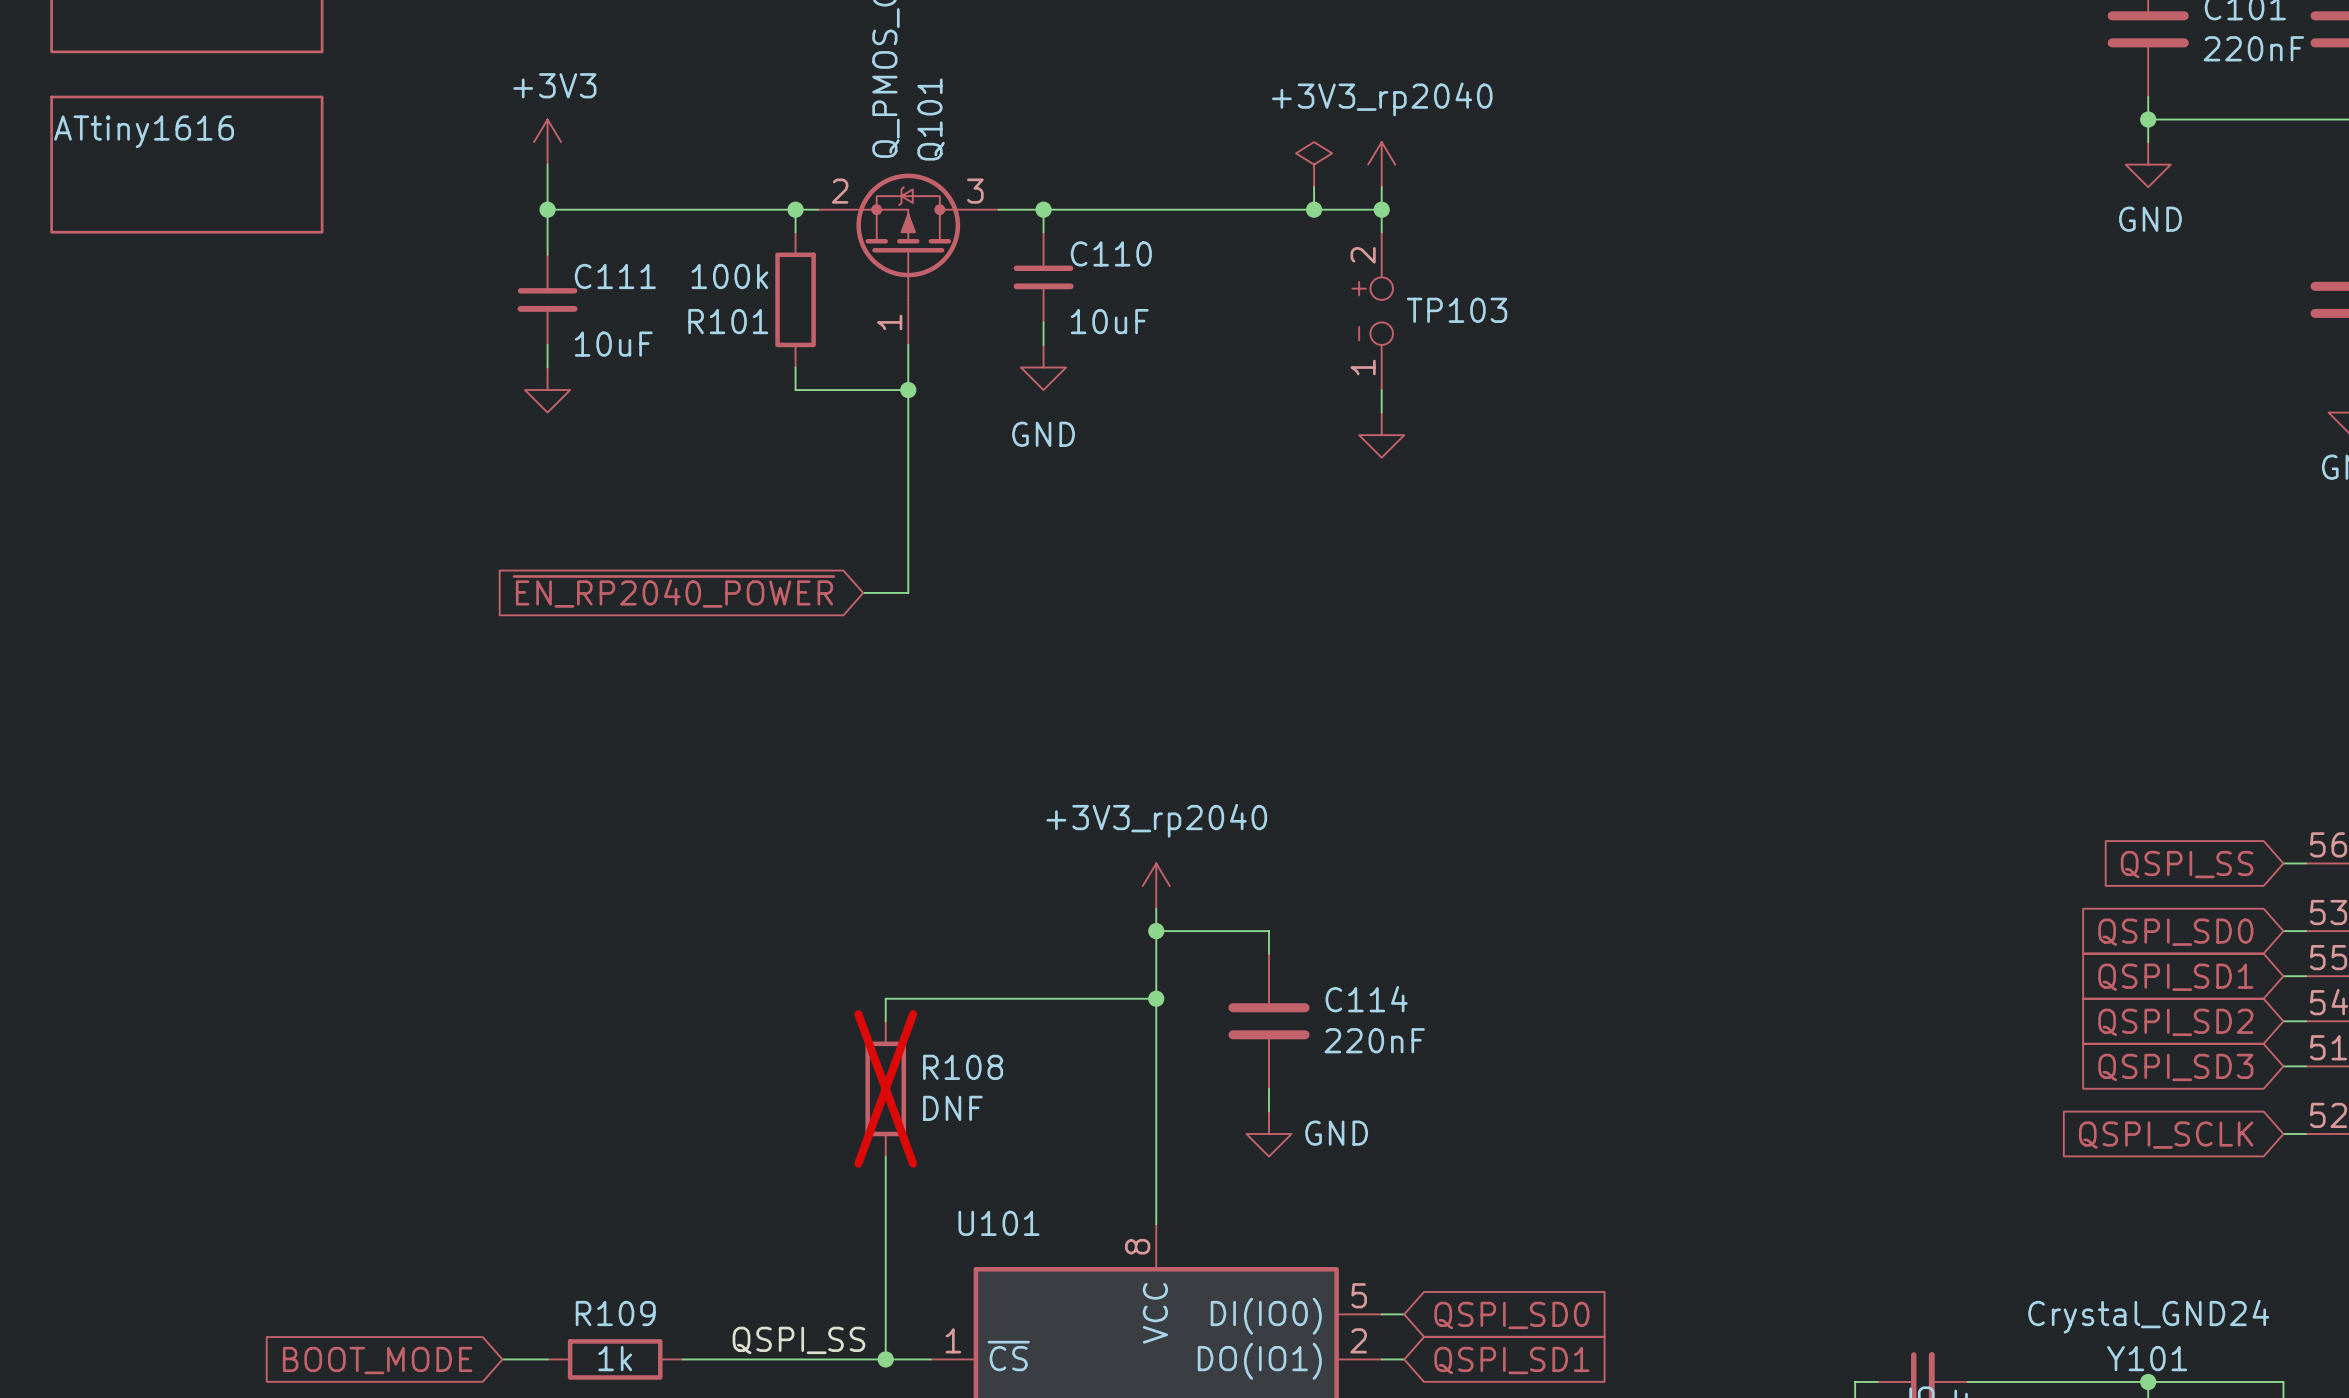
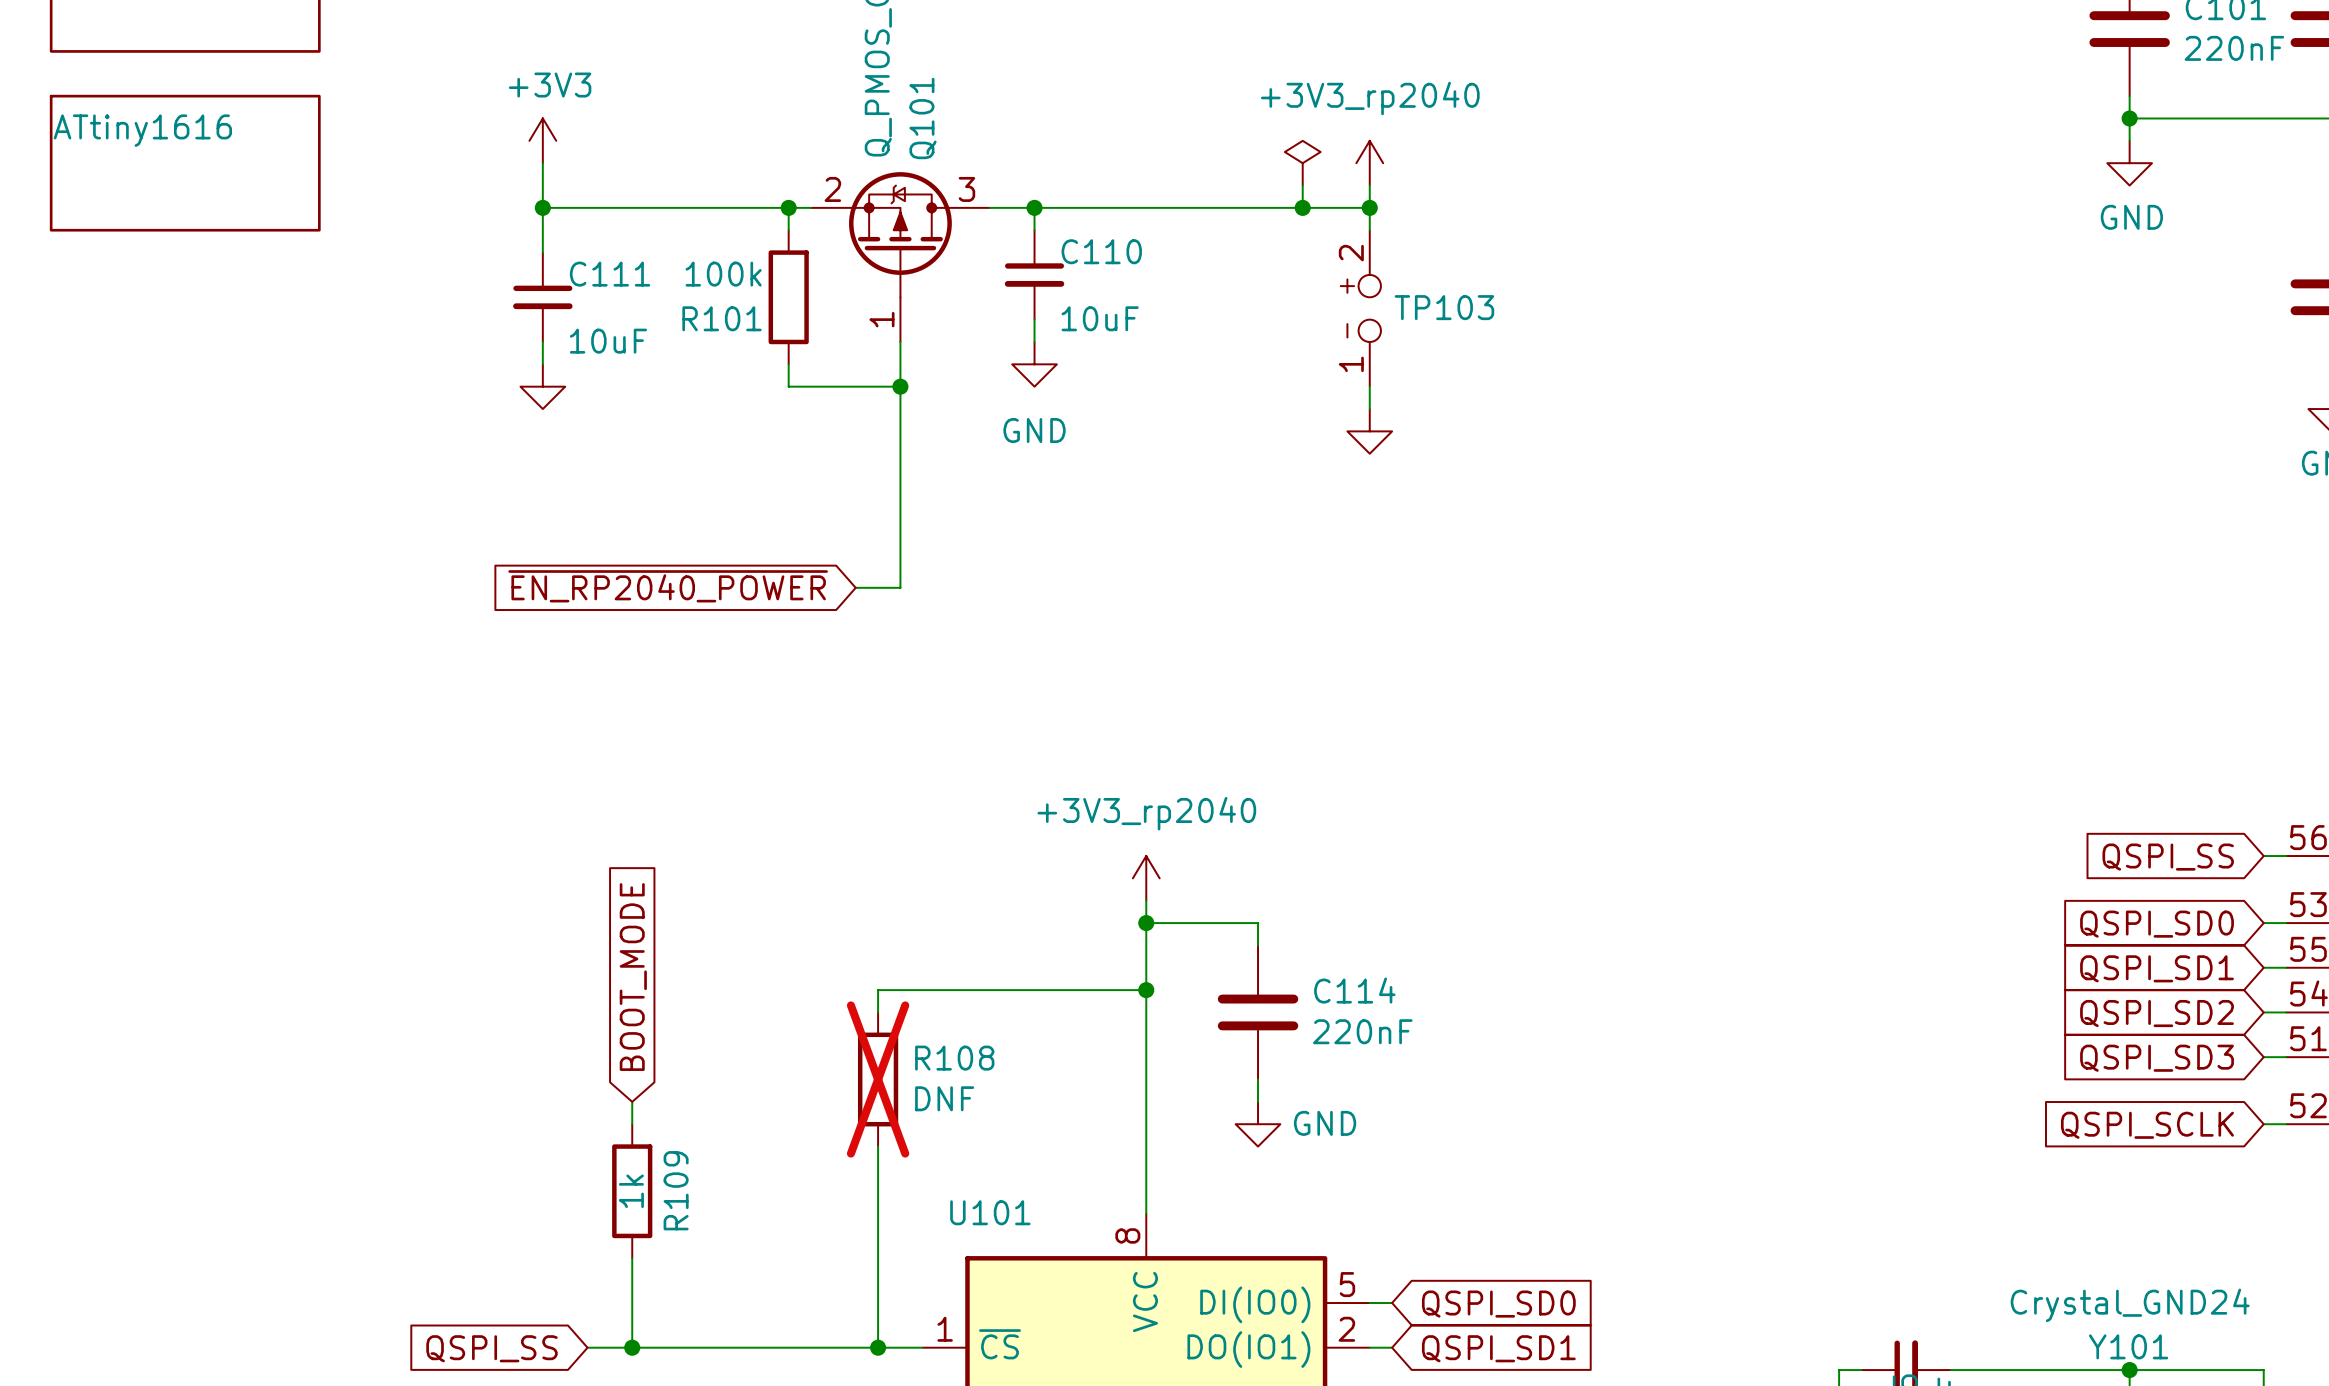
wire: none -> (632, 1101) (632, 1124)
wire: none -> (632, 1258) (632, 1347)
label: QSPI_SS (798, 1340) -> none
wire: (502, 1359) (547, 1359) -> none
wire: none -> (587, 1347) (676, 1347)
R109 rotation: 0° (615, 1359) -> 90° clockwise (632, 1191)
R109 position: (615, 1359) -> (632, 1191)
junction: none -> (632, 1347)
global label rotation: 0° (377, 1360) -> 90° clockwise (633, 977)
global label position: BOOT_MODE (377, 1360) -> BOOT_MODE (633, 977)
global label: none -> QSPI_SS (491, 1348)

